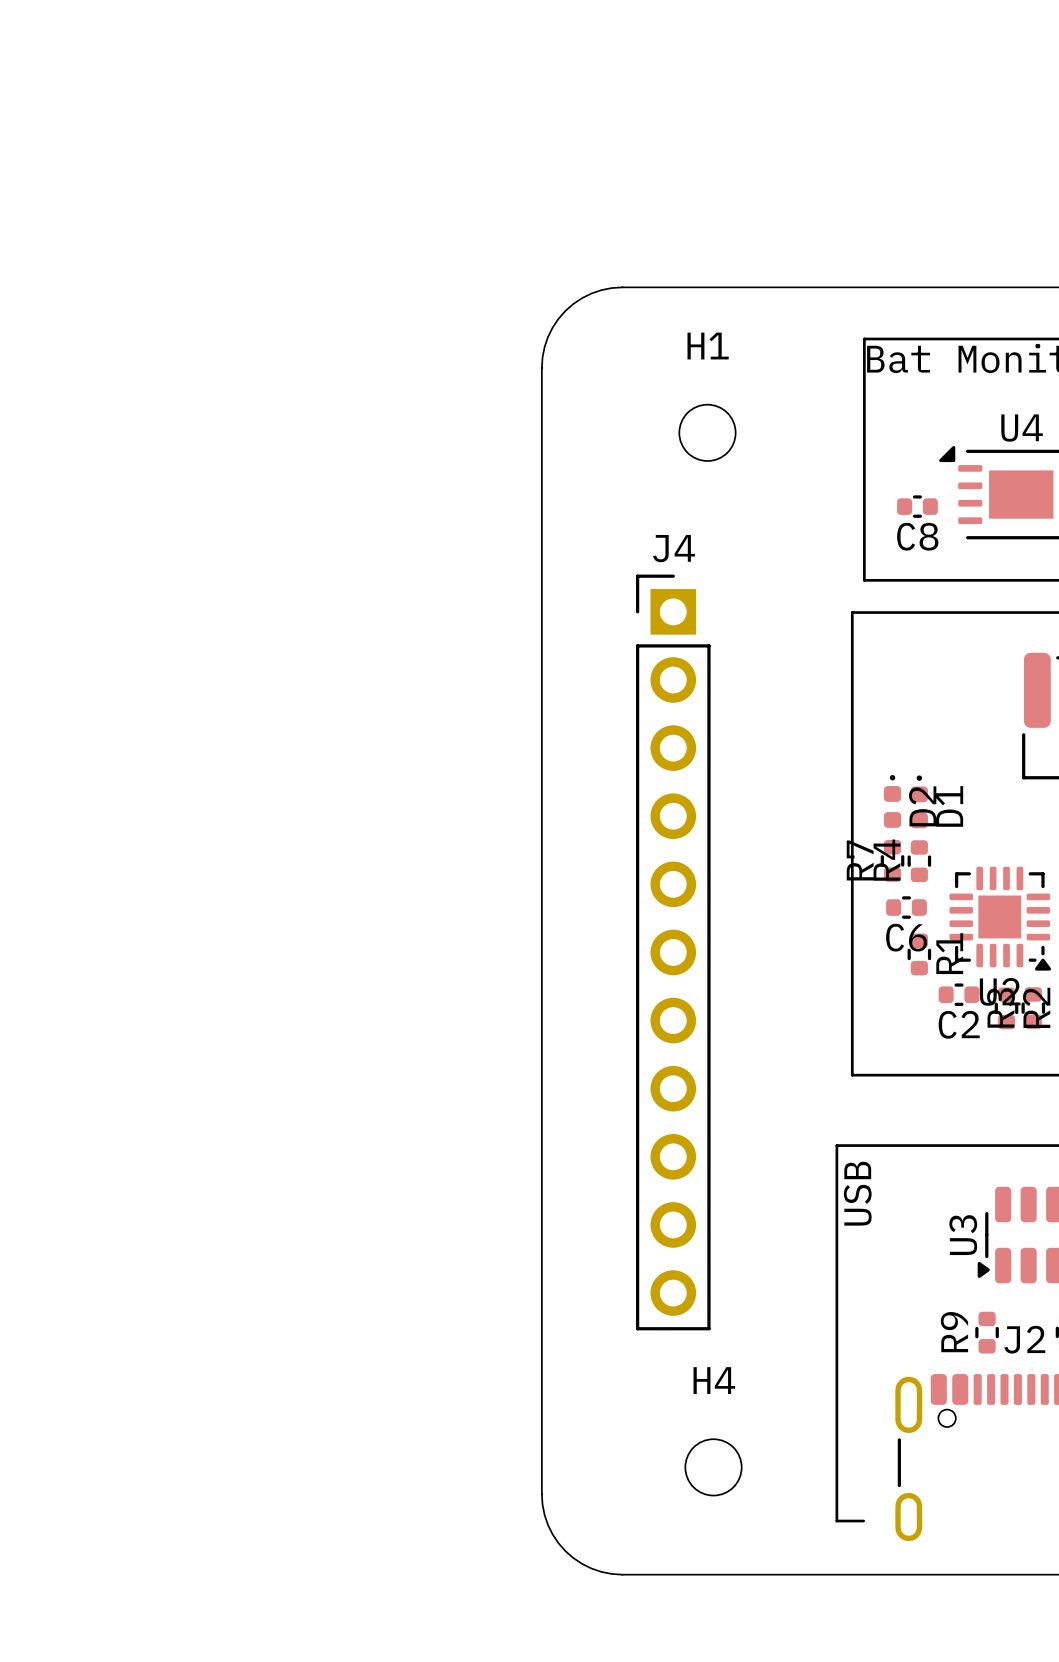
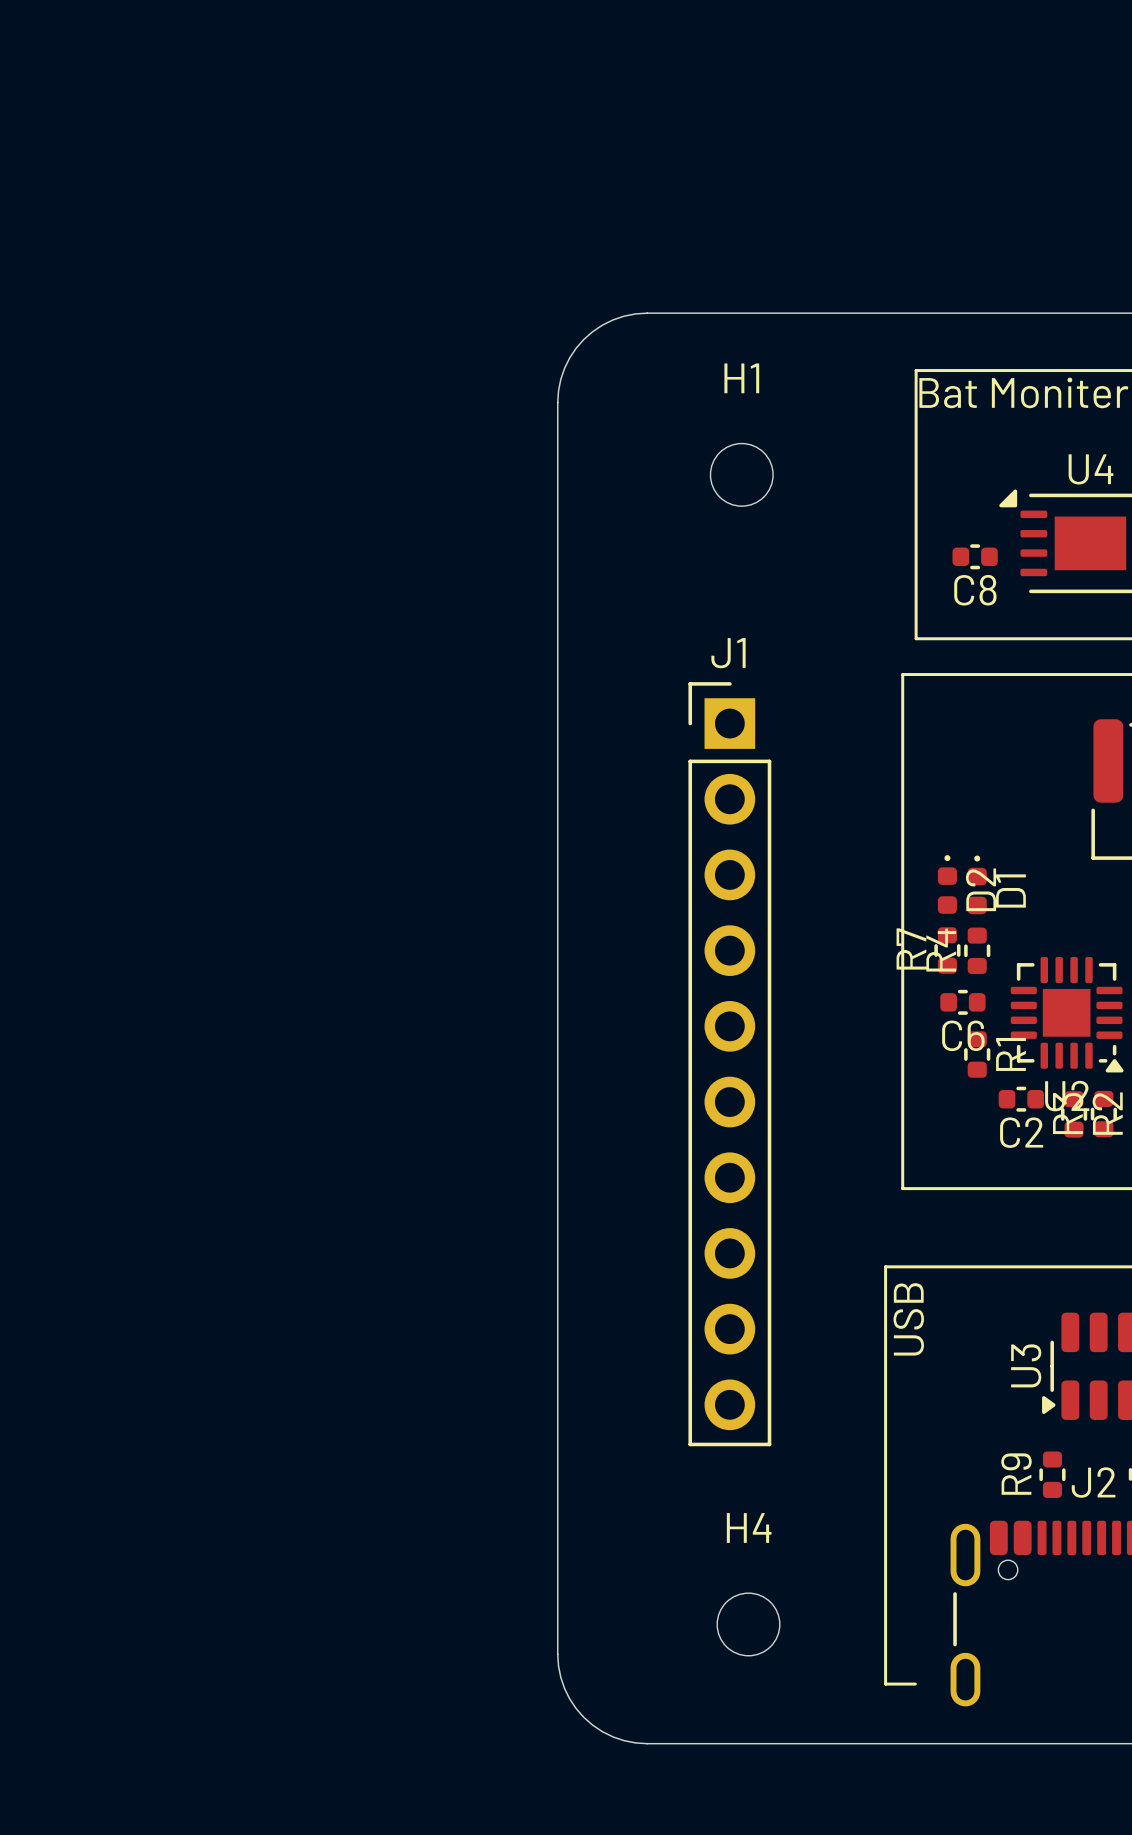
J4: (673, 952) -> none
J1: none -> (729, 1064)

